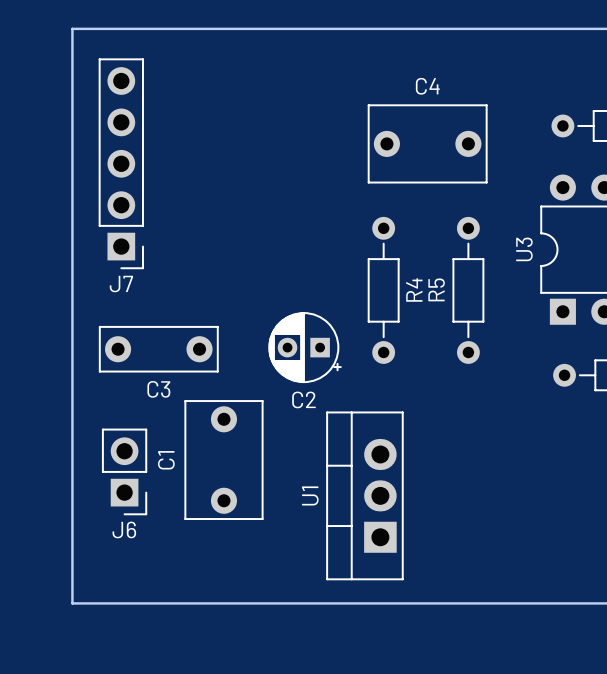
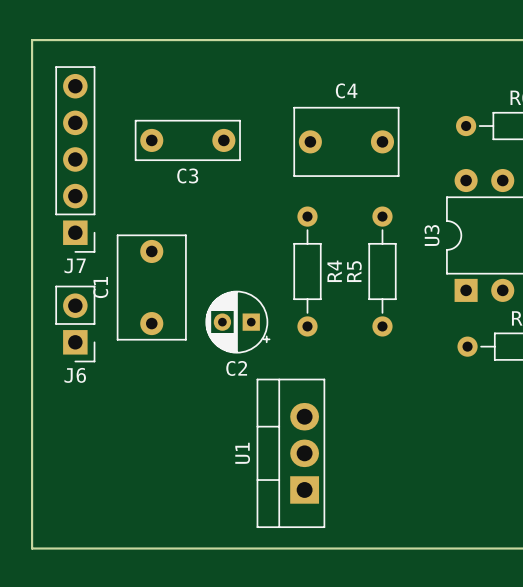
C3 position: (158, 349) -> (187, 140)
C1 position: (223, 460) -> (151, 287)
J6 position: (124, 471) -> (75, 324)

